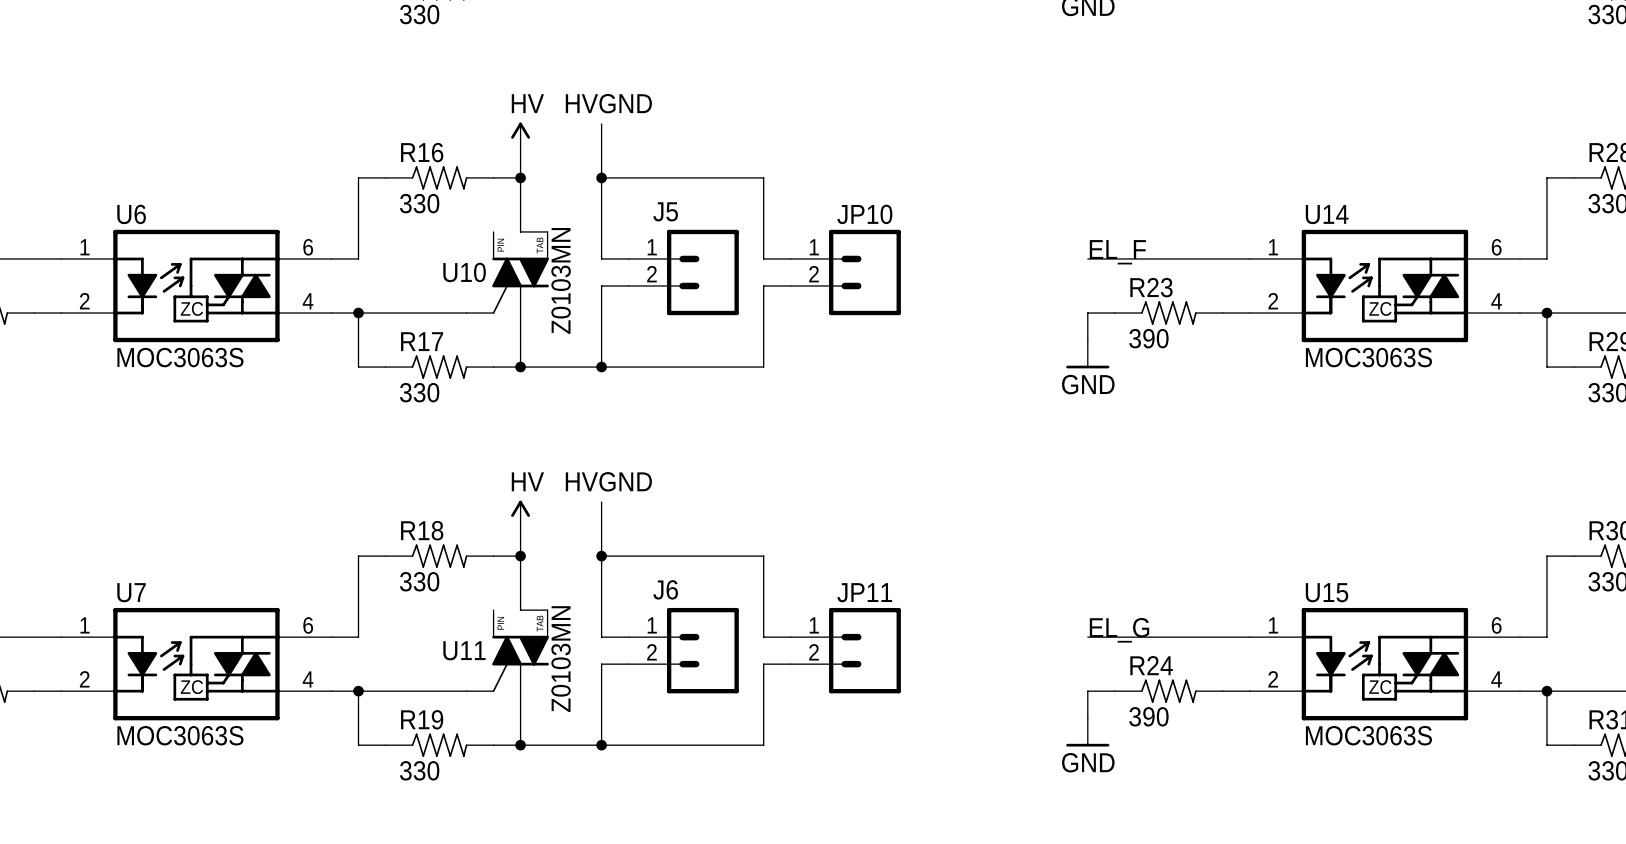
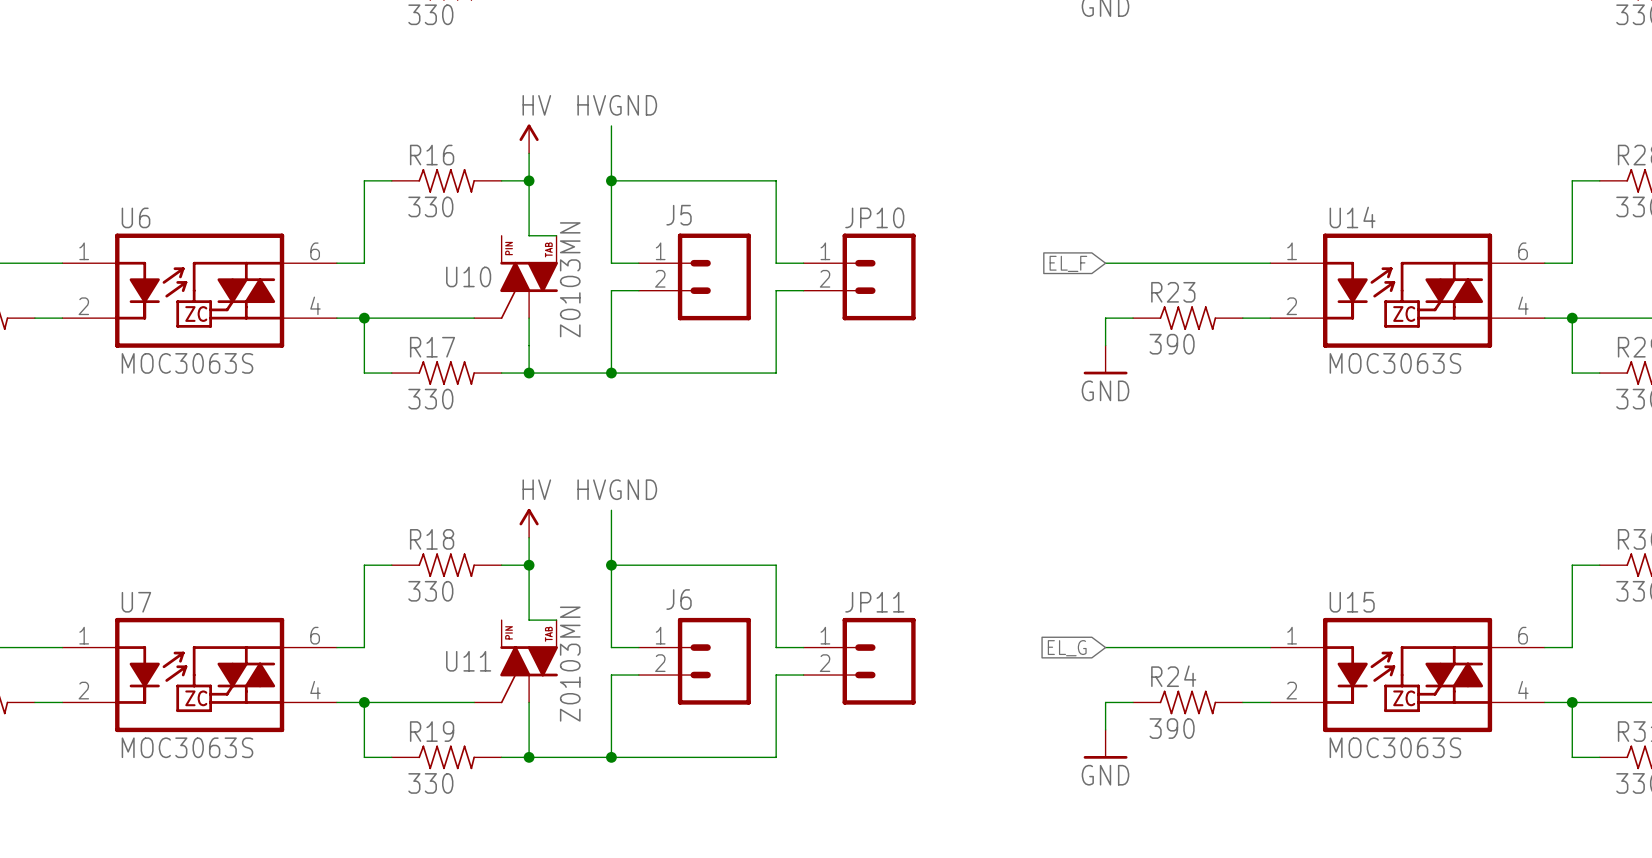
label: EL_F (1117, 252) -> none
global label: none -> EL_F (1068, 263)
label: EL_G (1119, 630) -> none
global label: none -> EL_G (1067, 648)

